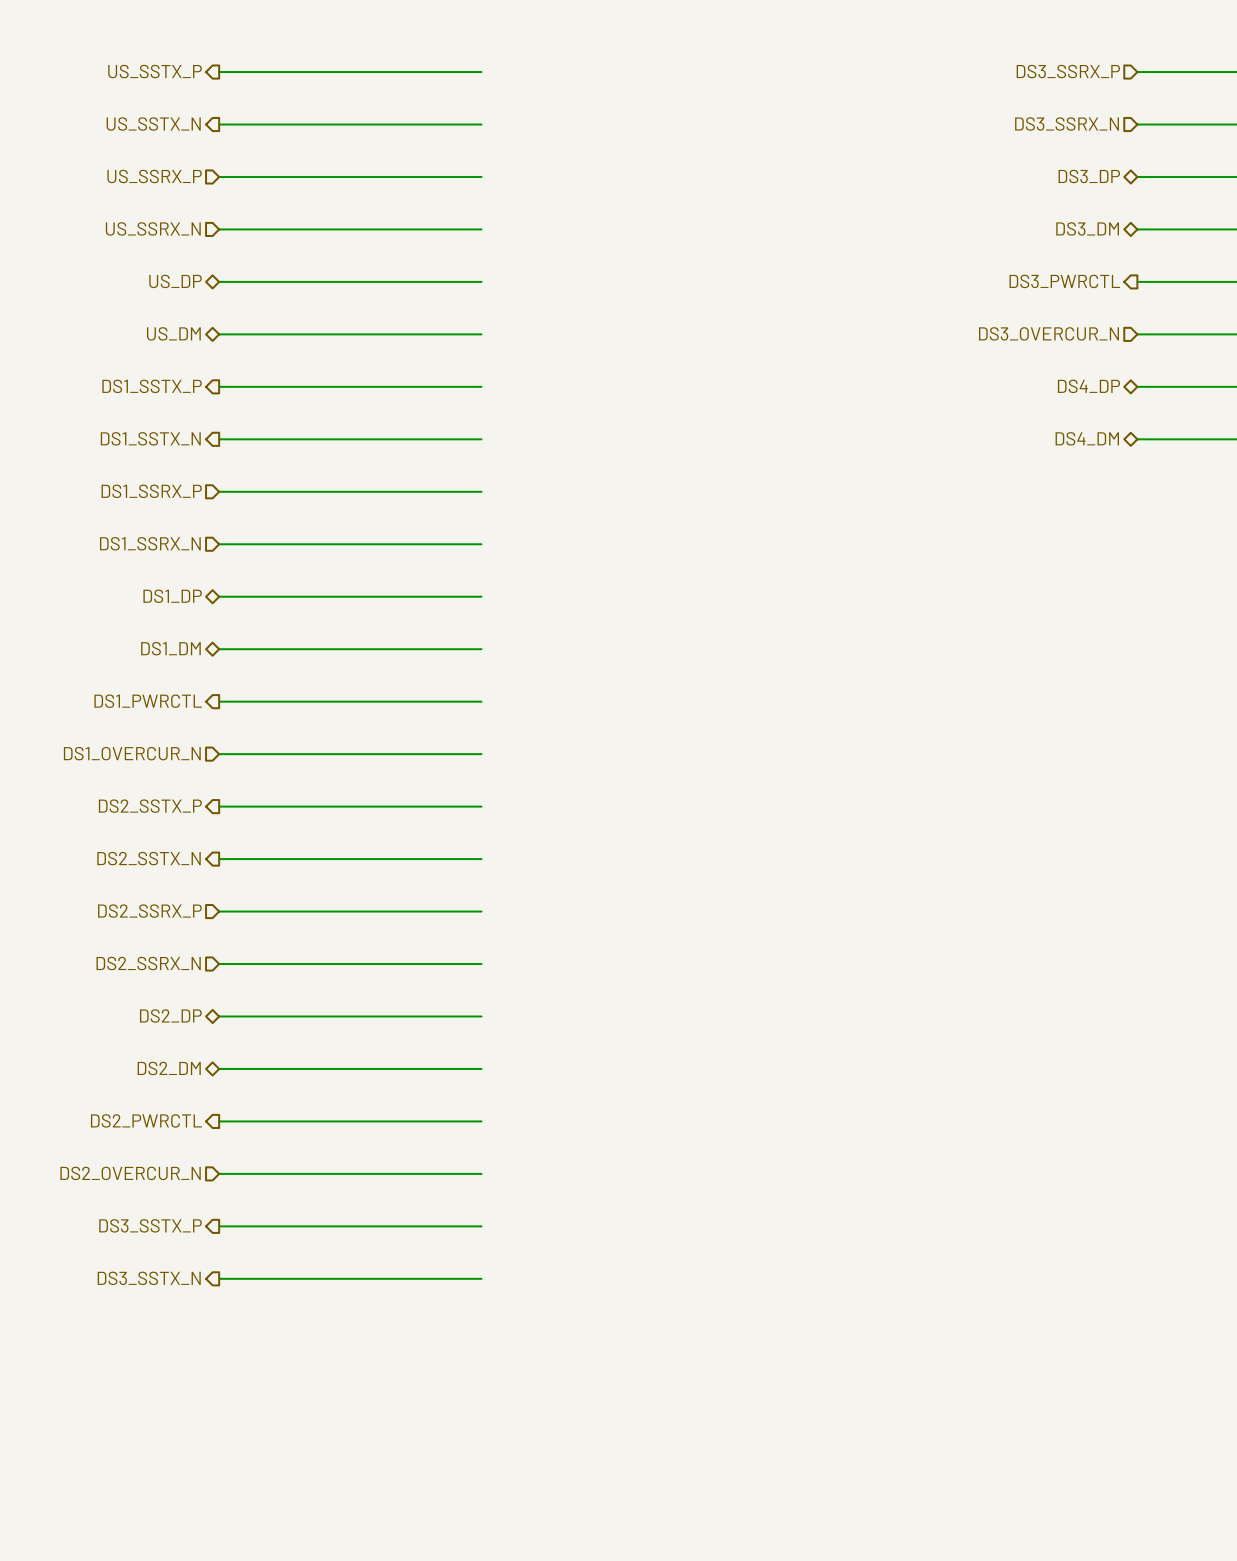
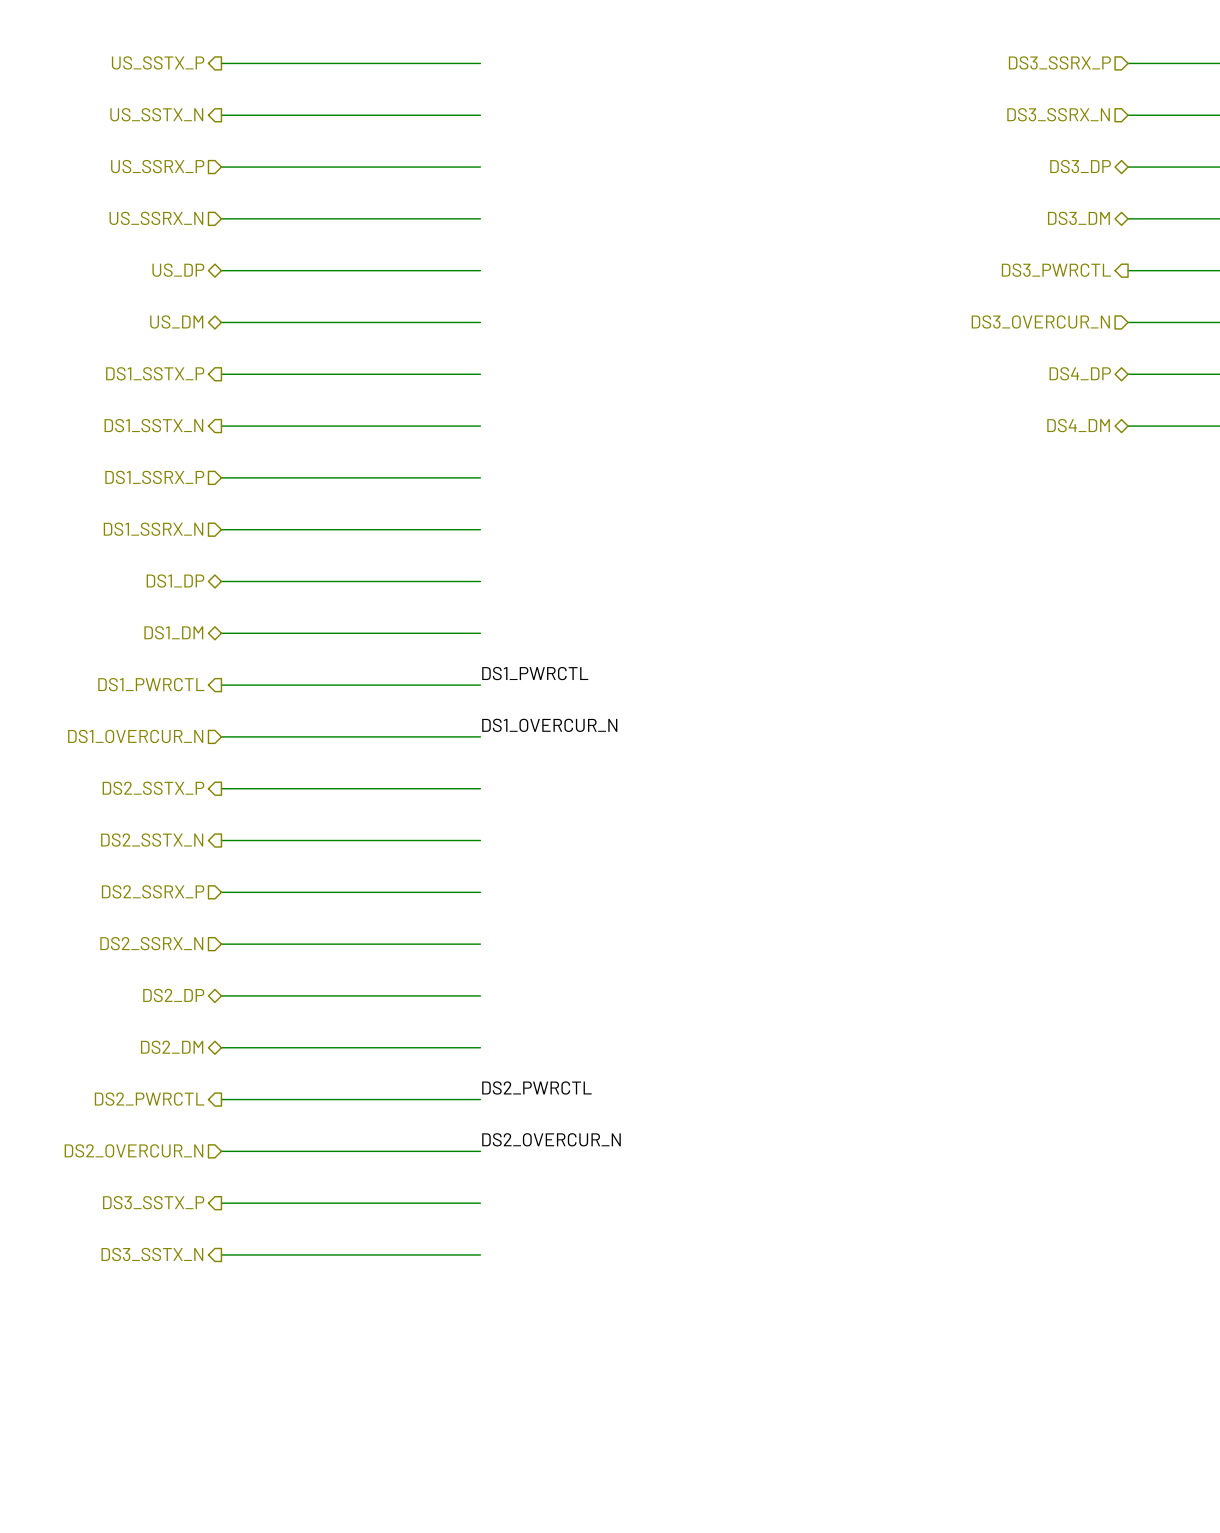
label: none -> DS1_PWRCTL (535, 673)
label: none -> DS1_OVERCUR_N (549, 725)
label: none -> DS2_PWRCTL (536, 1088)
label: none -> DS2_OVERCUR_N (551, 1139)

